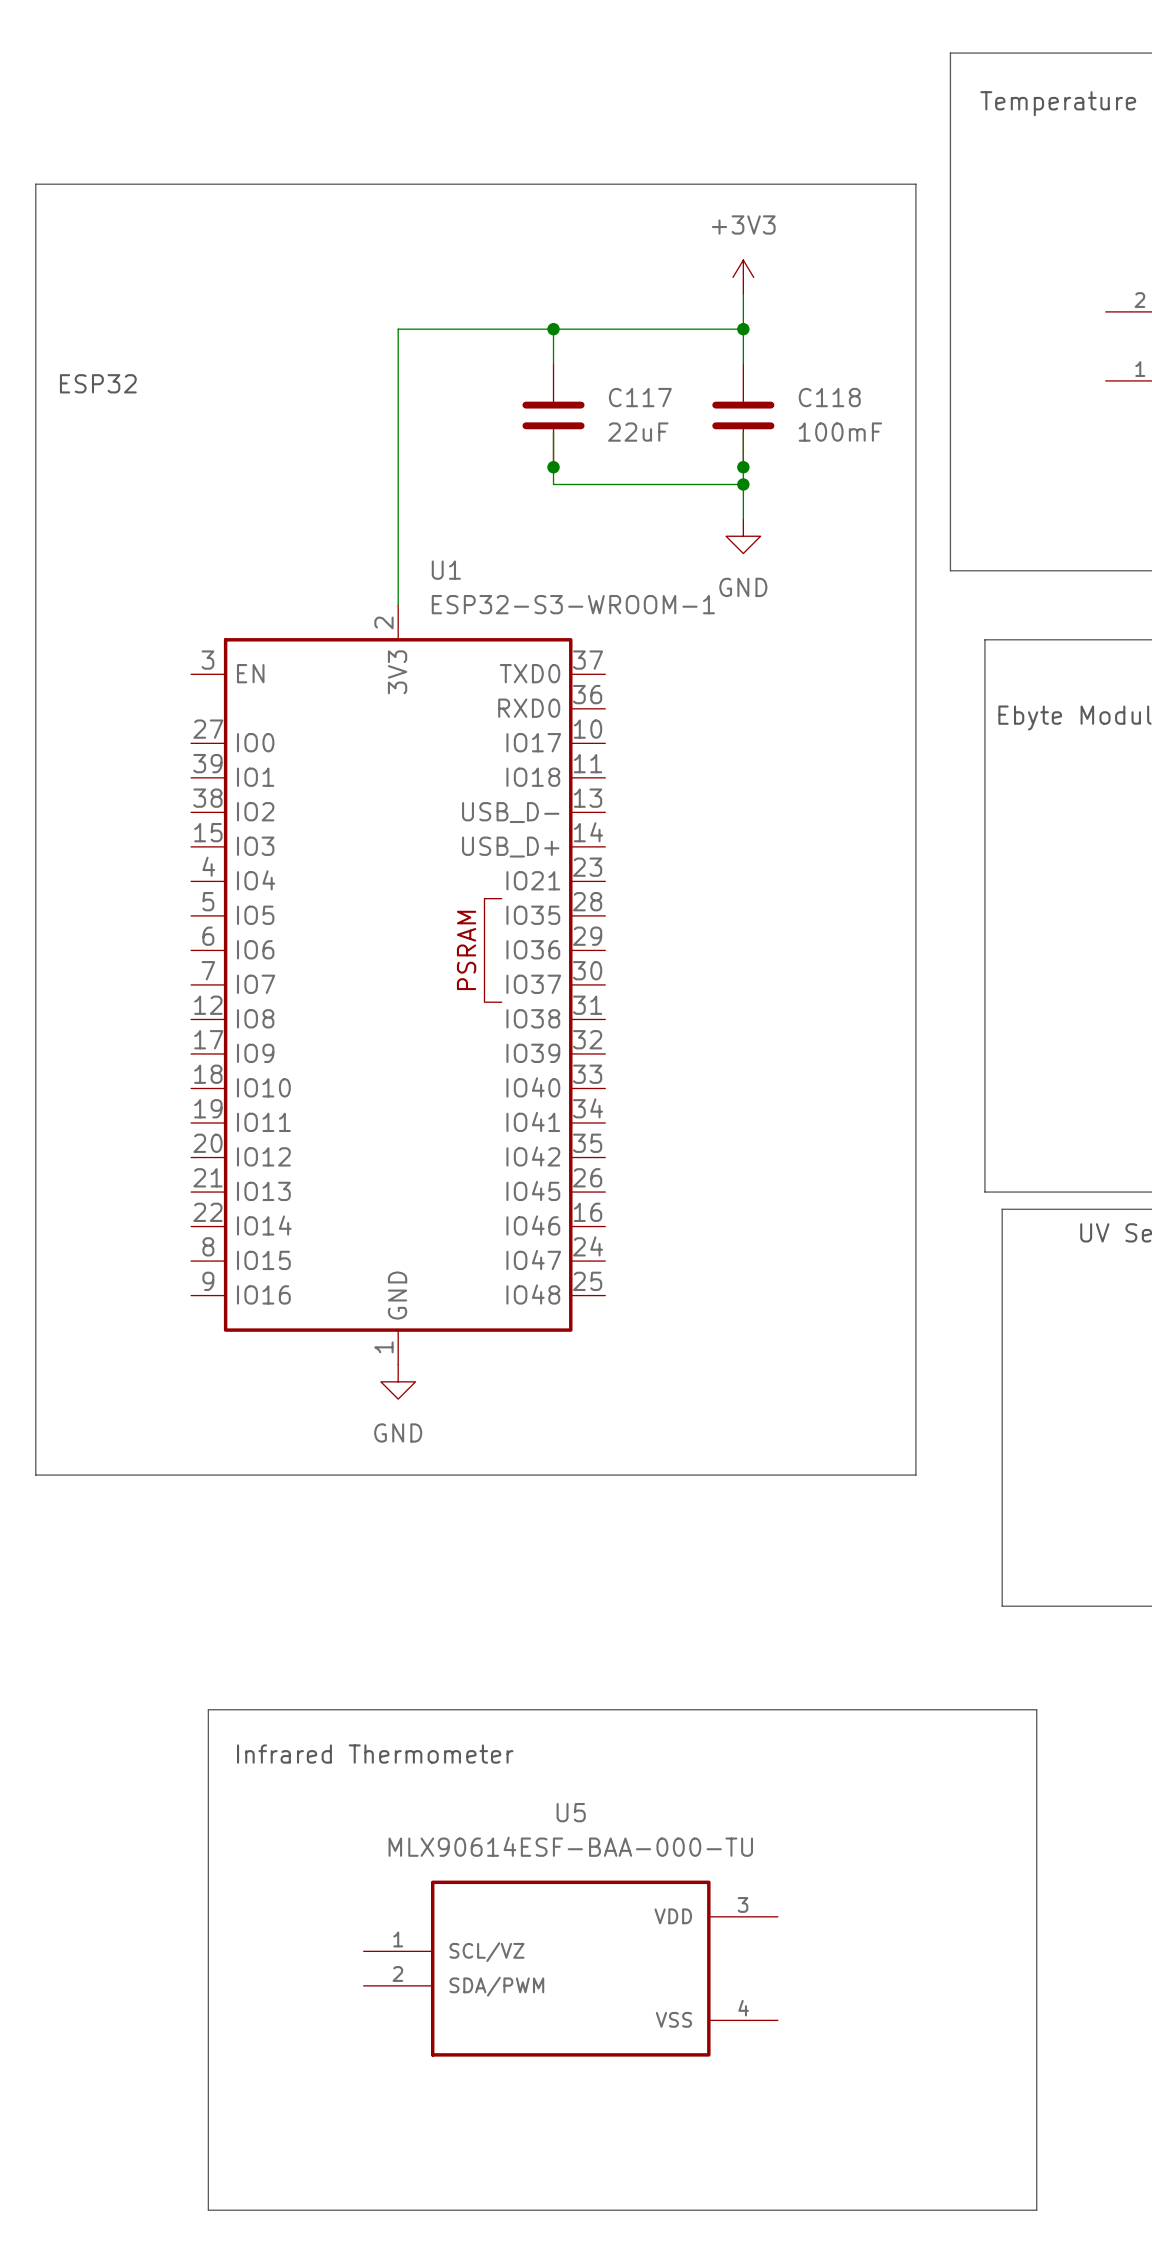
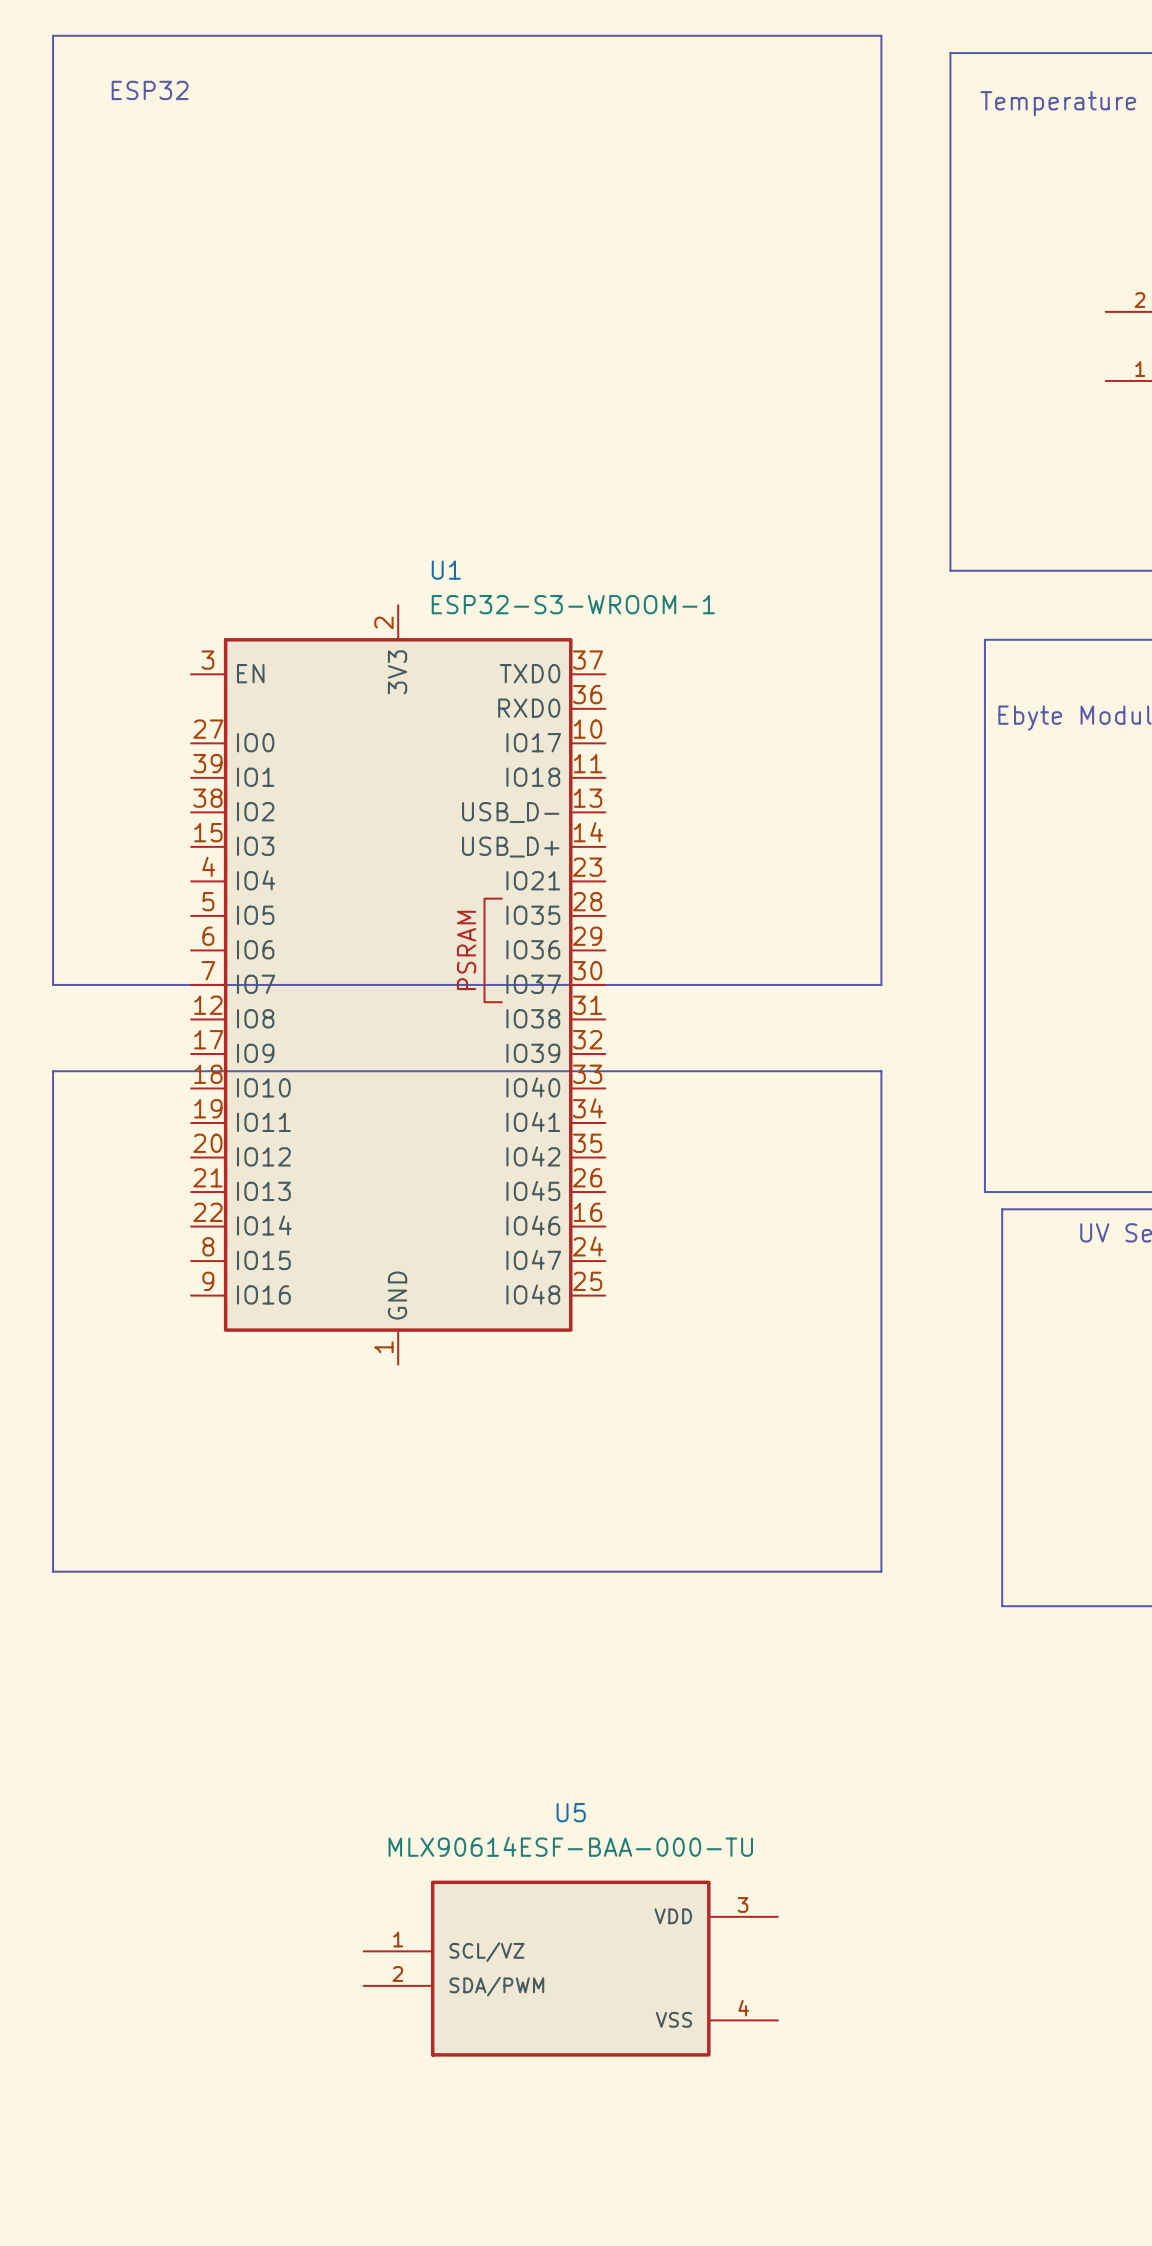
line: (35, 184) (915, 184) (915, 1475) (35, 1475) (35, 184) -> (53, 35) (53, 984) (881, 984) (881, 35) (53, 35)
power symbol: +3V3 (743, 277) -> none
wire: (743, 294) (743, 363) -> none
wire: (553, 329) (553, 363) -> none
junction: (553, 329) -> none
wire: (743, 329) (398, 329) (398, 605) -> none
junction: (743, 329) -> none
text position: ESP32 (98, 383) -> ESP32 (150, 90)
C117: 22uF (553, 415) -> none
C118: 100mF (743, 415) -> none
wire: (553, 432) (553, 484) (743, 484) -> none
wire: (743, 432) (743, 519) -> none
junction: (553, 467) -> none
junction: (743, 467) -> none
junction: (743, 484) -> none
power symbol: GND (743, 536) -> none
line: none -> (53, 1071) (881, 1071) (881, 1571) (53, 1571) (53, 1071)
power symbol: GND (398, 1381) -> none
line: (208, 1709) (1036, 1709) (1036, 2210) (208, 2210) (208, 1709) -> none
text: Infrared Thermometer (375, 1754) -> none

